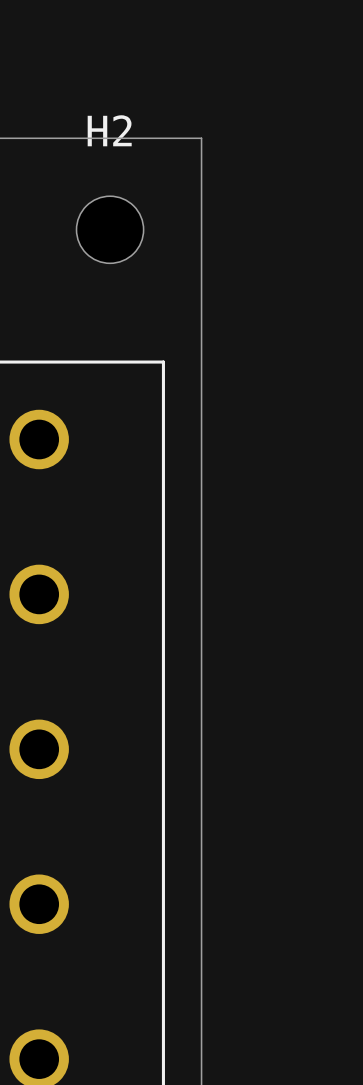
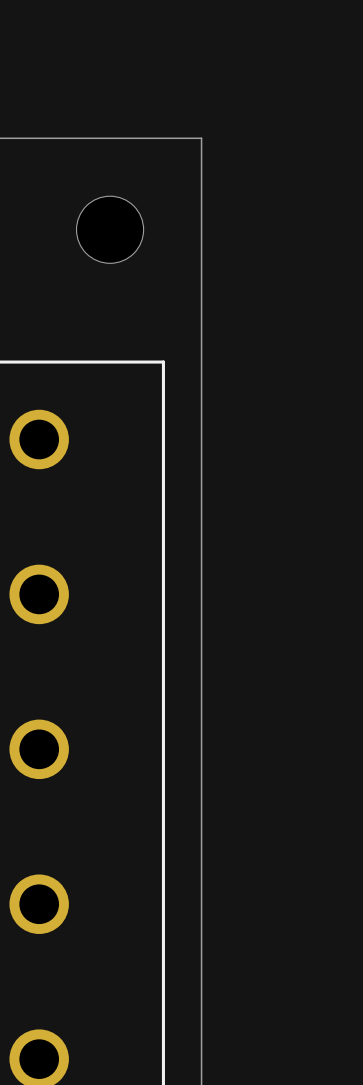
H2 name: H2 (109, 130) -> none

